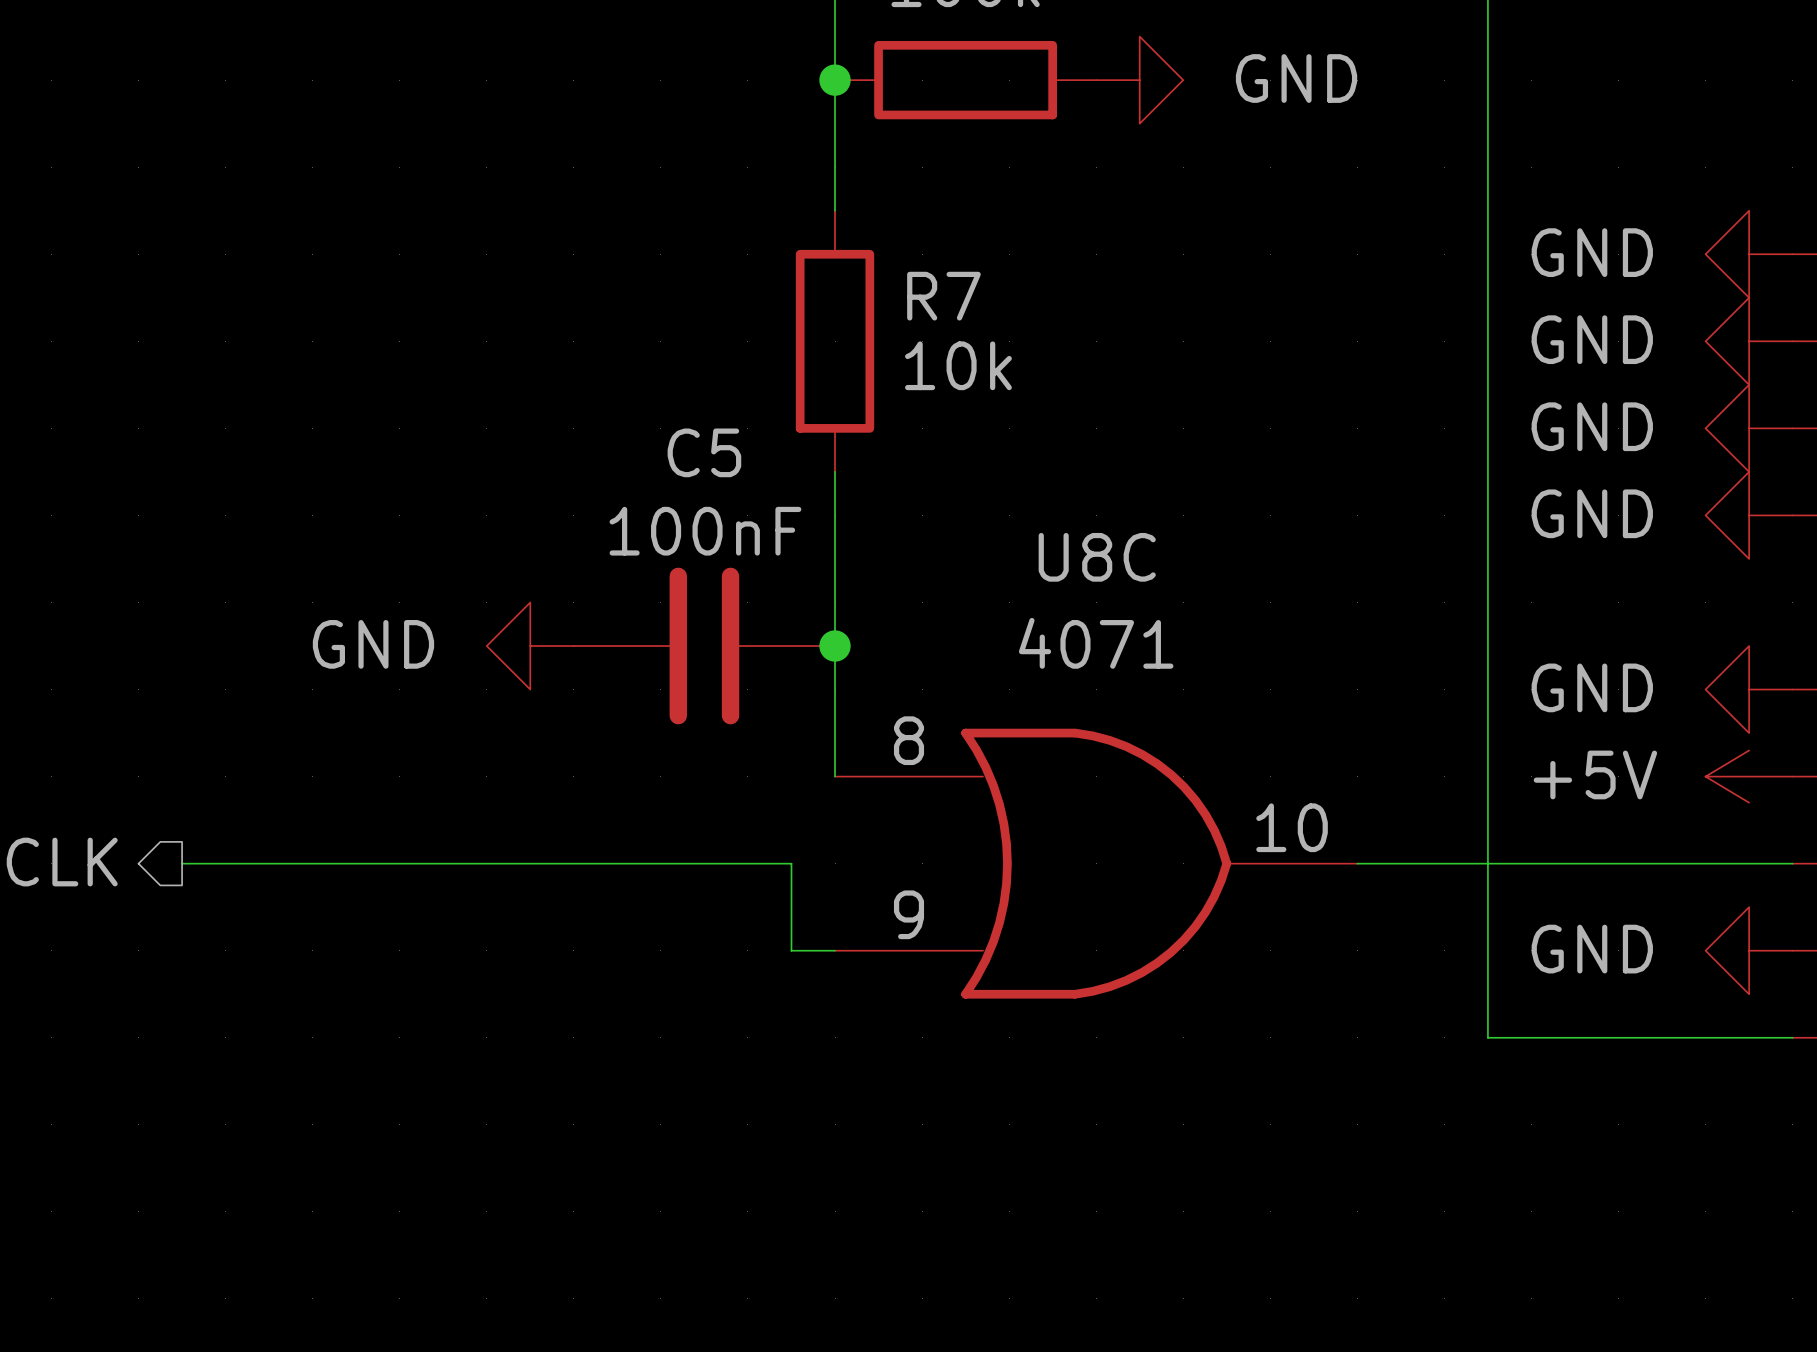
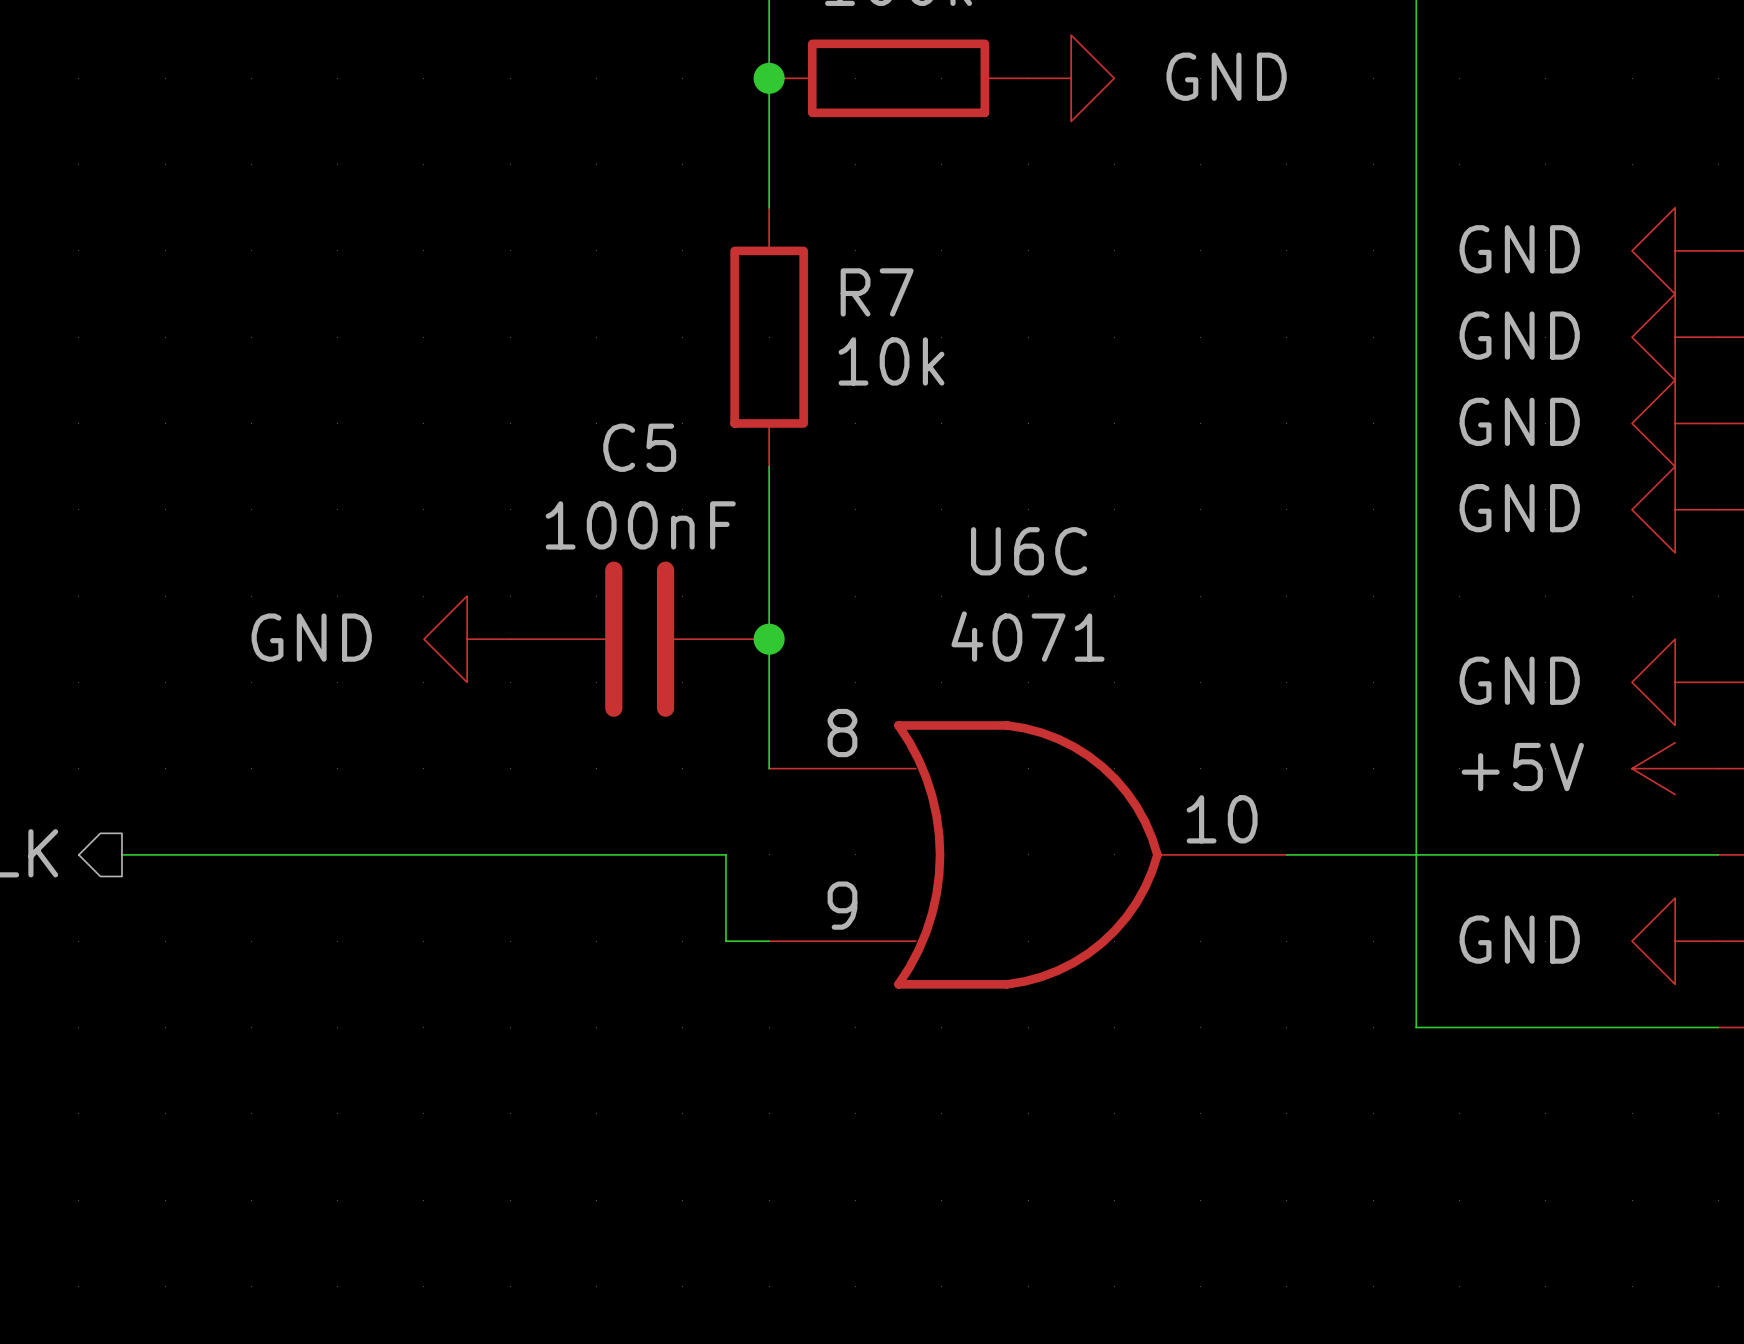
U8C name: U8C (1097, 557) -> U6C (1029, 551)

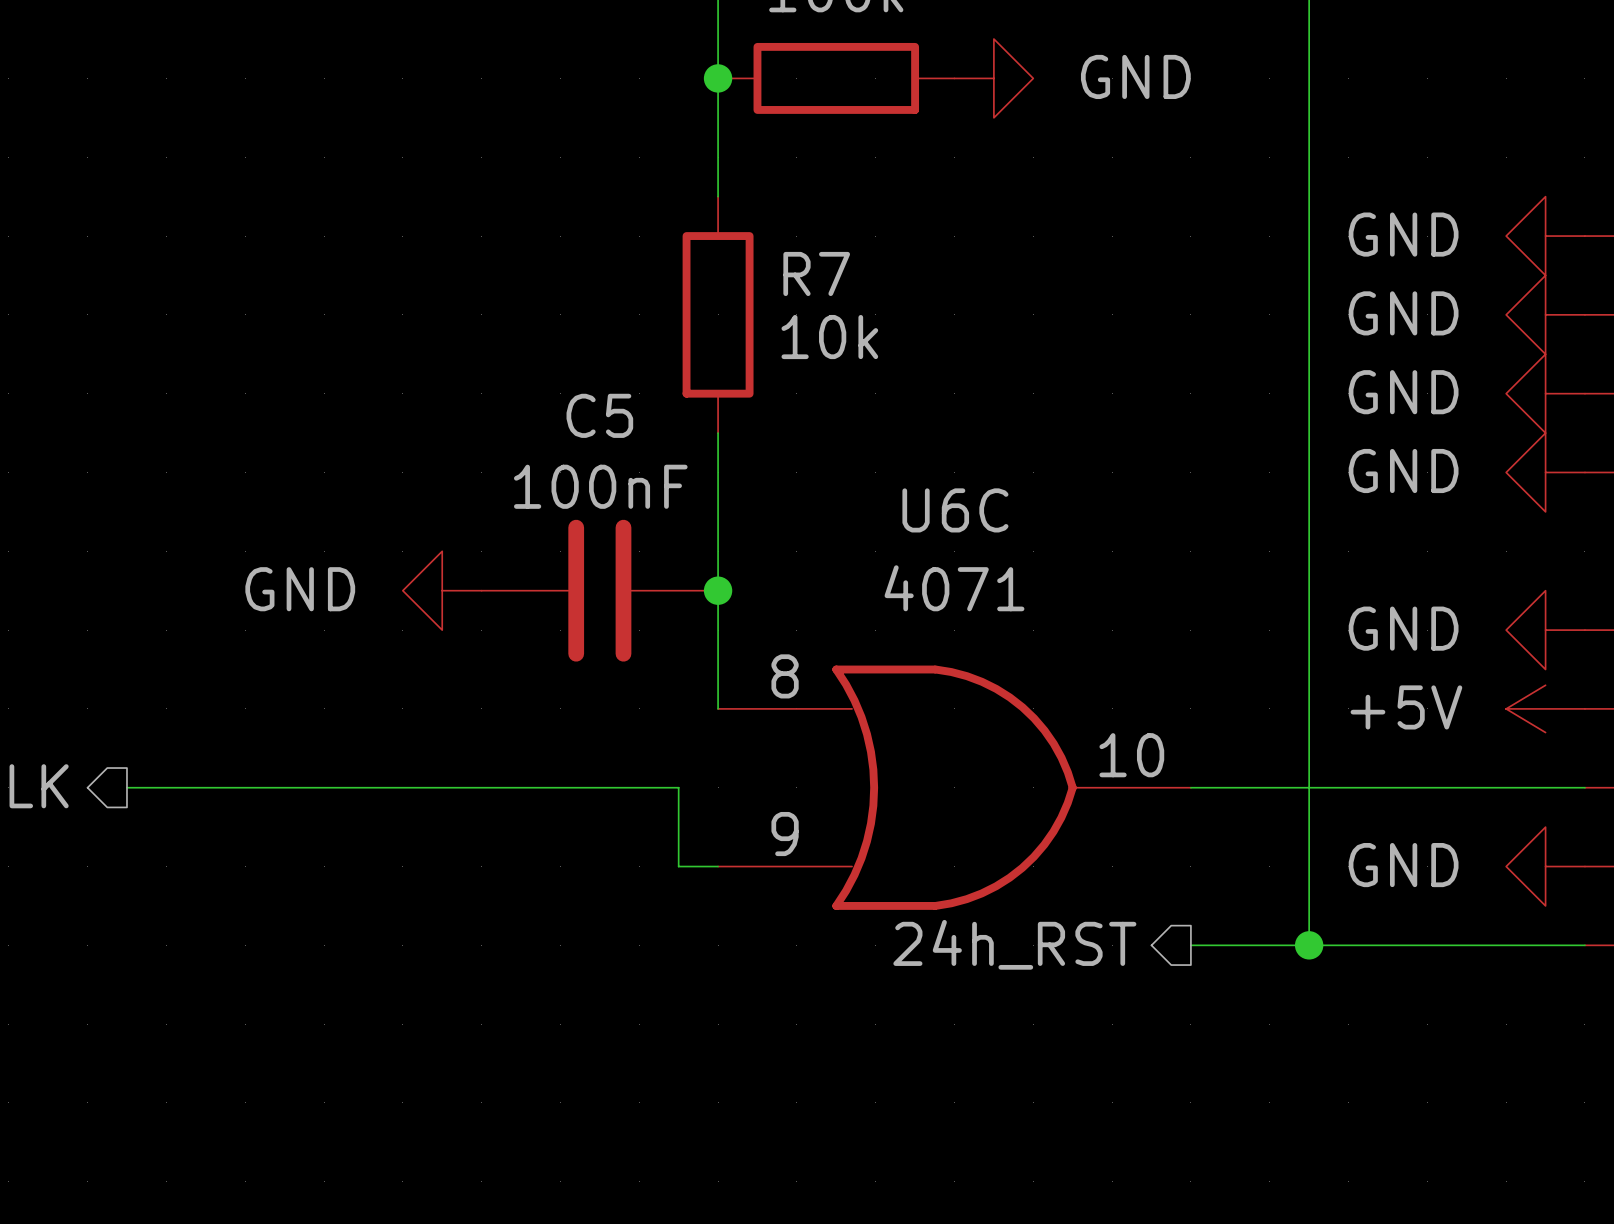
hierarchical label: none -> 24h_RST (1014, 944)
wire: none -> (1190, 945) (1309, 945)
junction: none -> (1309, 945)

